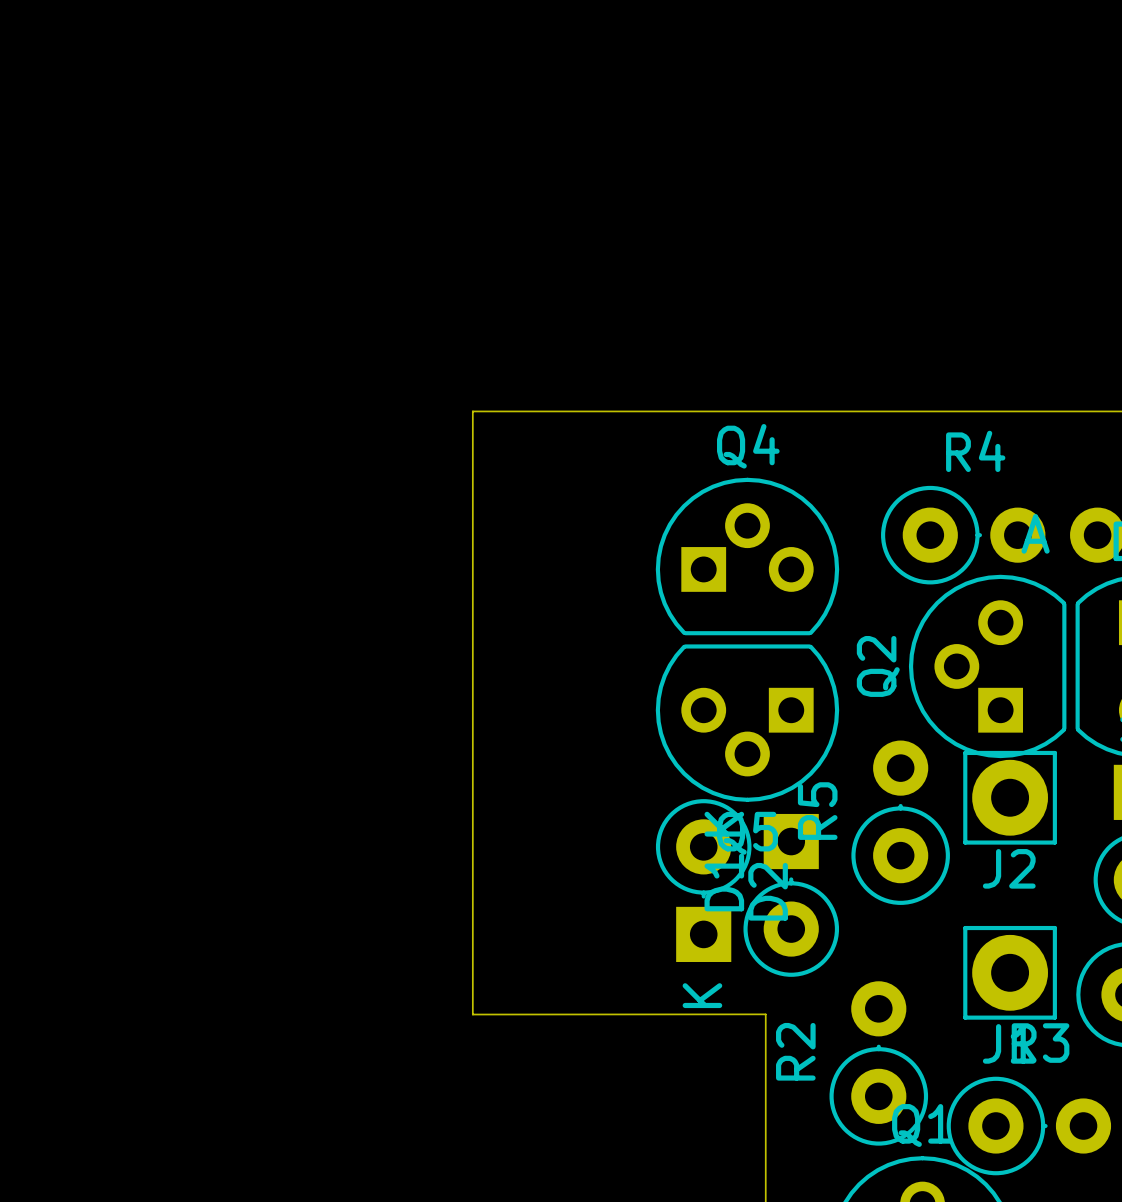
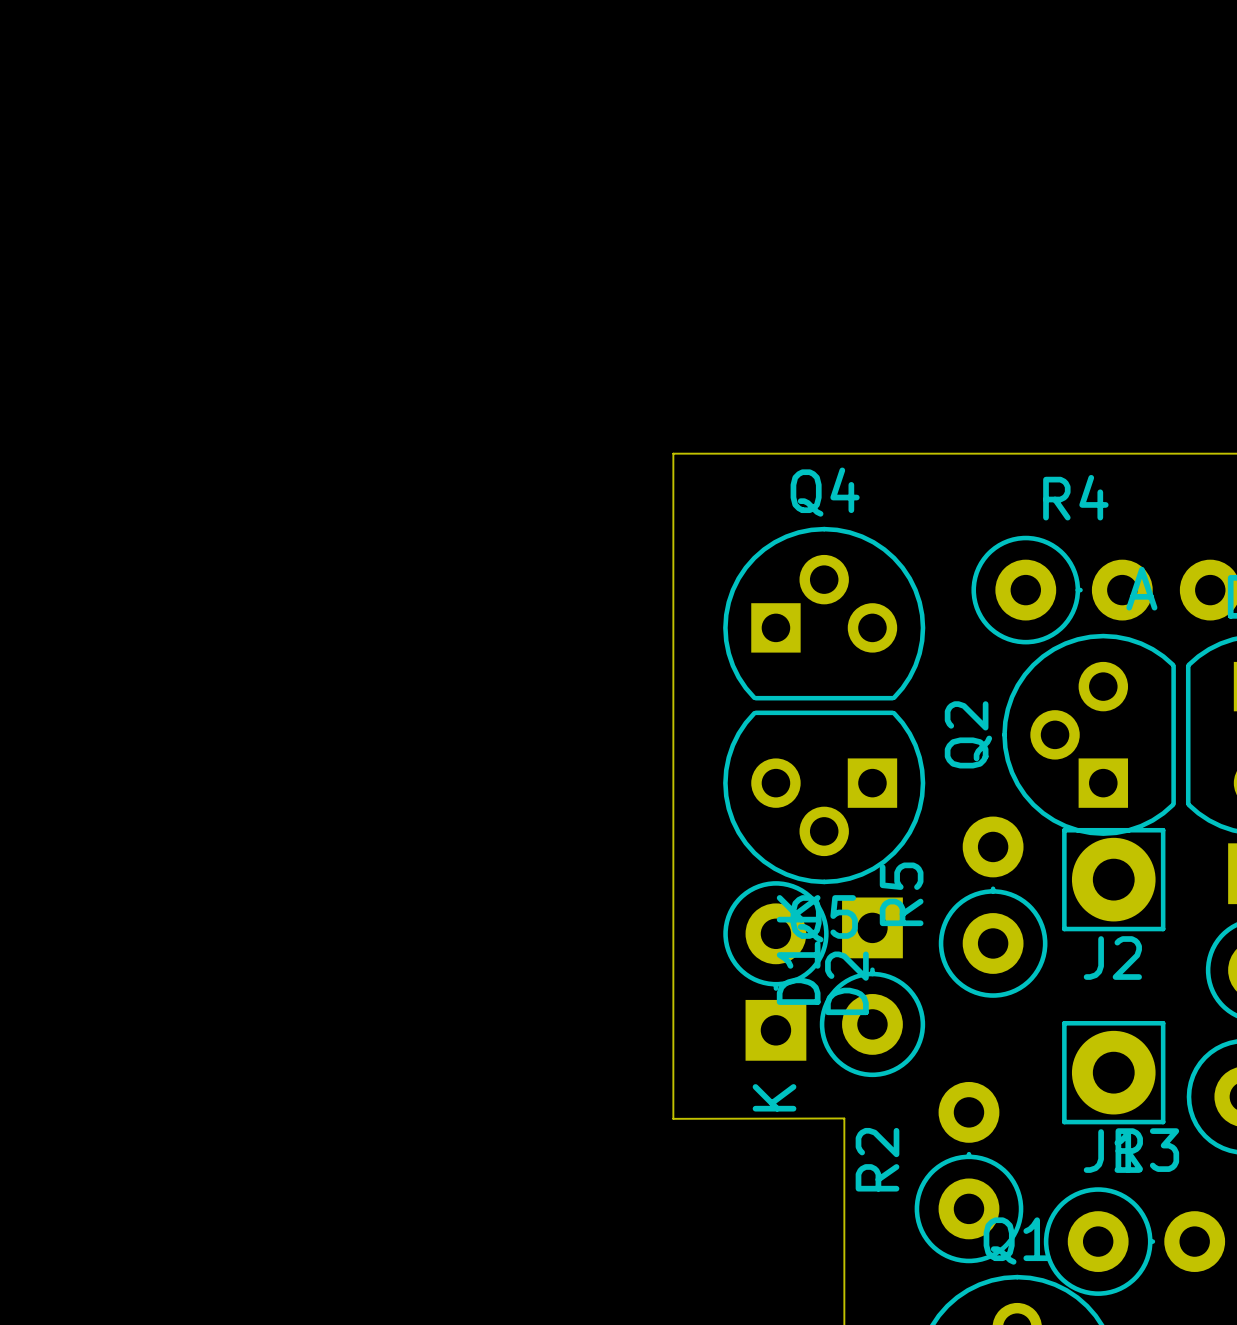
board edge: (610, 411) (472, 411) (472, 1014) (765, 1014) -> (673, 453) (673, 1118) (844, 1118)

